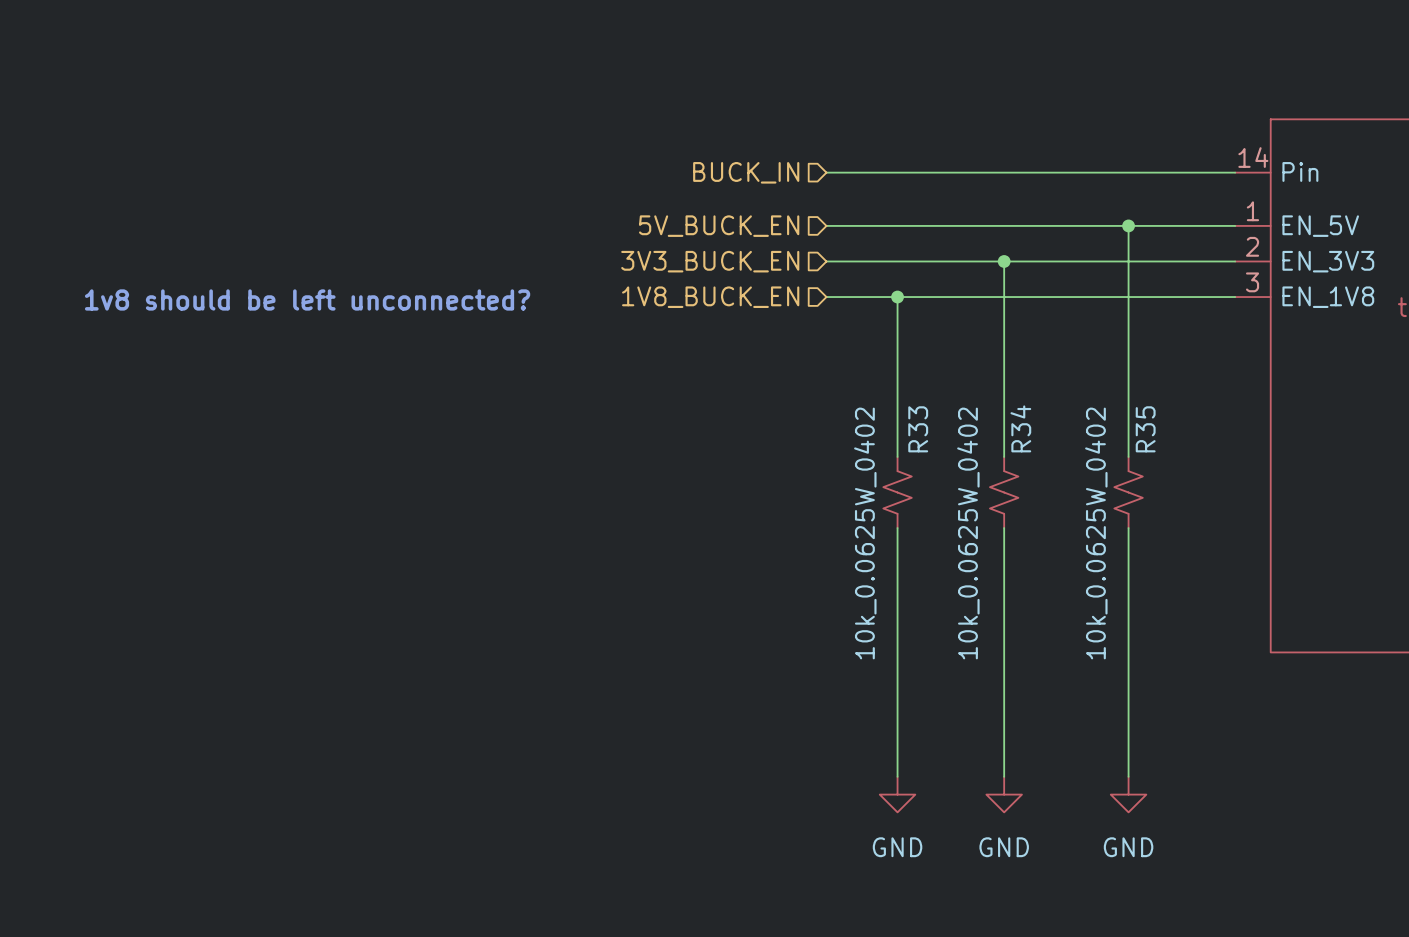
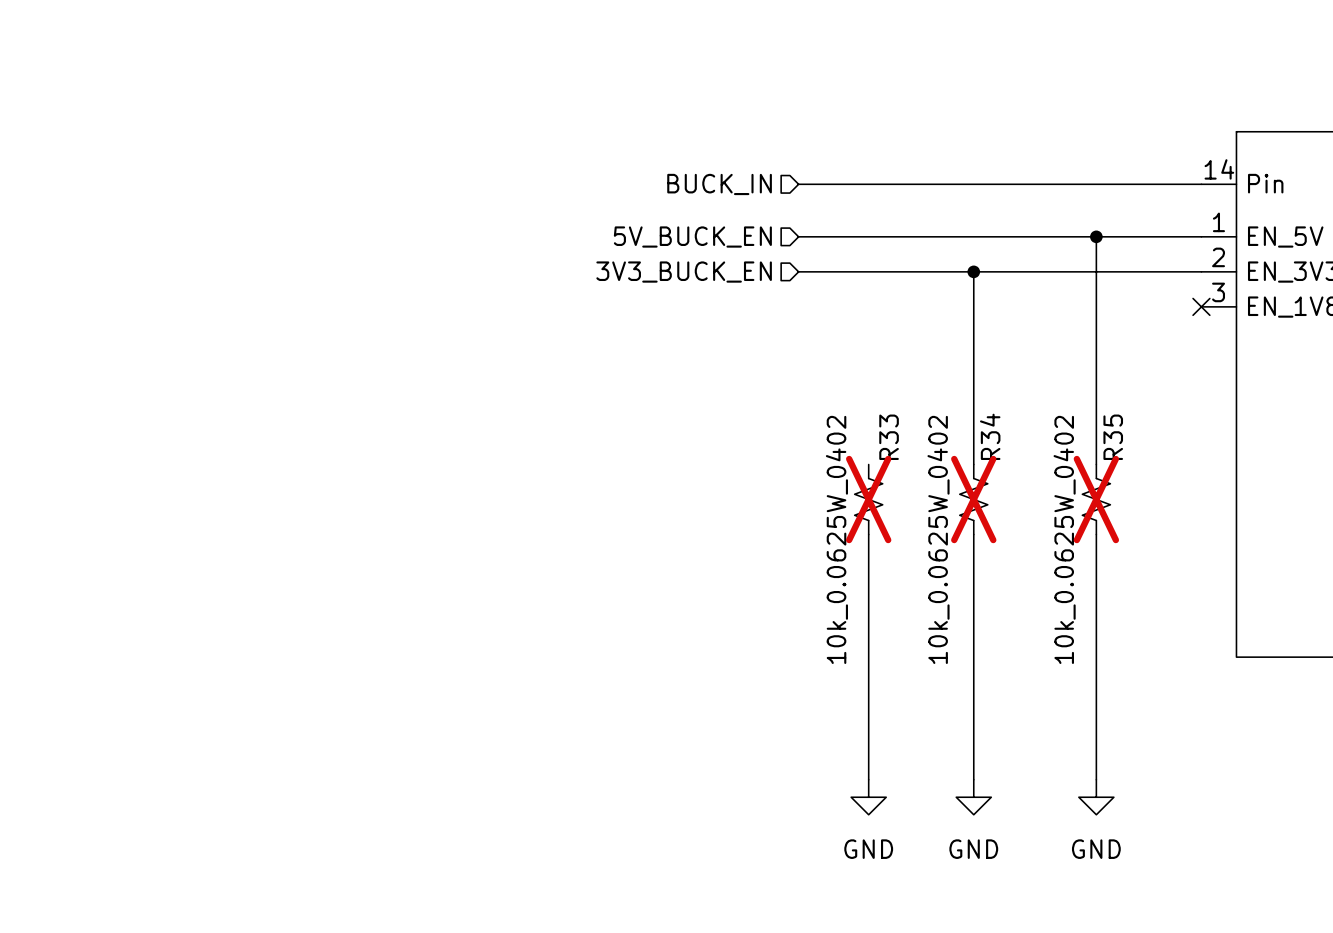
hierarchical label: 1V8_BUCK_EN (710, 297) -> none
wire: (826, 297) (1235, 297) -> none
wire: (897, 297) (897, 456) -> none
junction: (897, 297) -> none
no-connect mark: none -> (1201, 306)
text: 1v8 should be left unconnected? (307, 299) -> none
R33 do-not-place cross: none -> (868, 499)
R34 do-not-place cross: none -> (973, 499)
R35 do-not-place cross: none -> (1096, 499)

